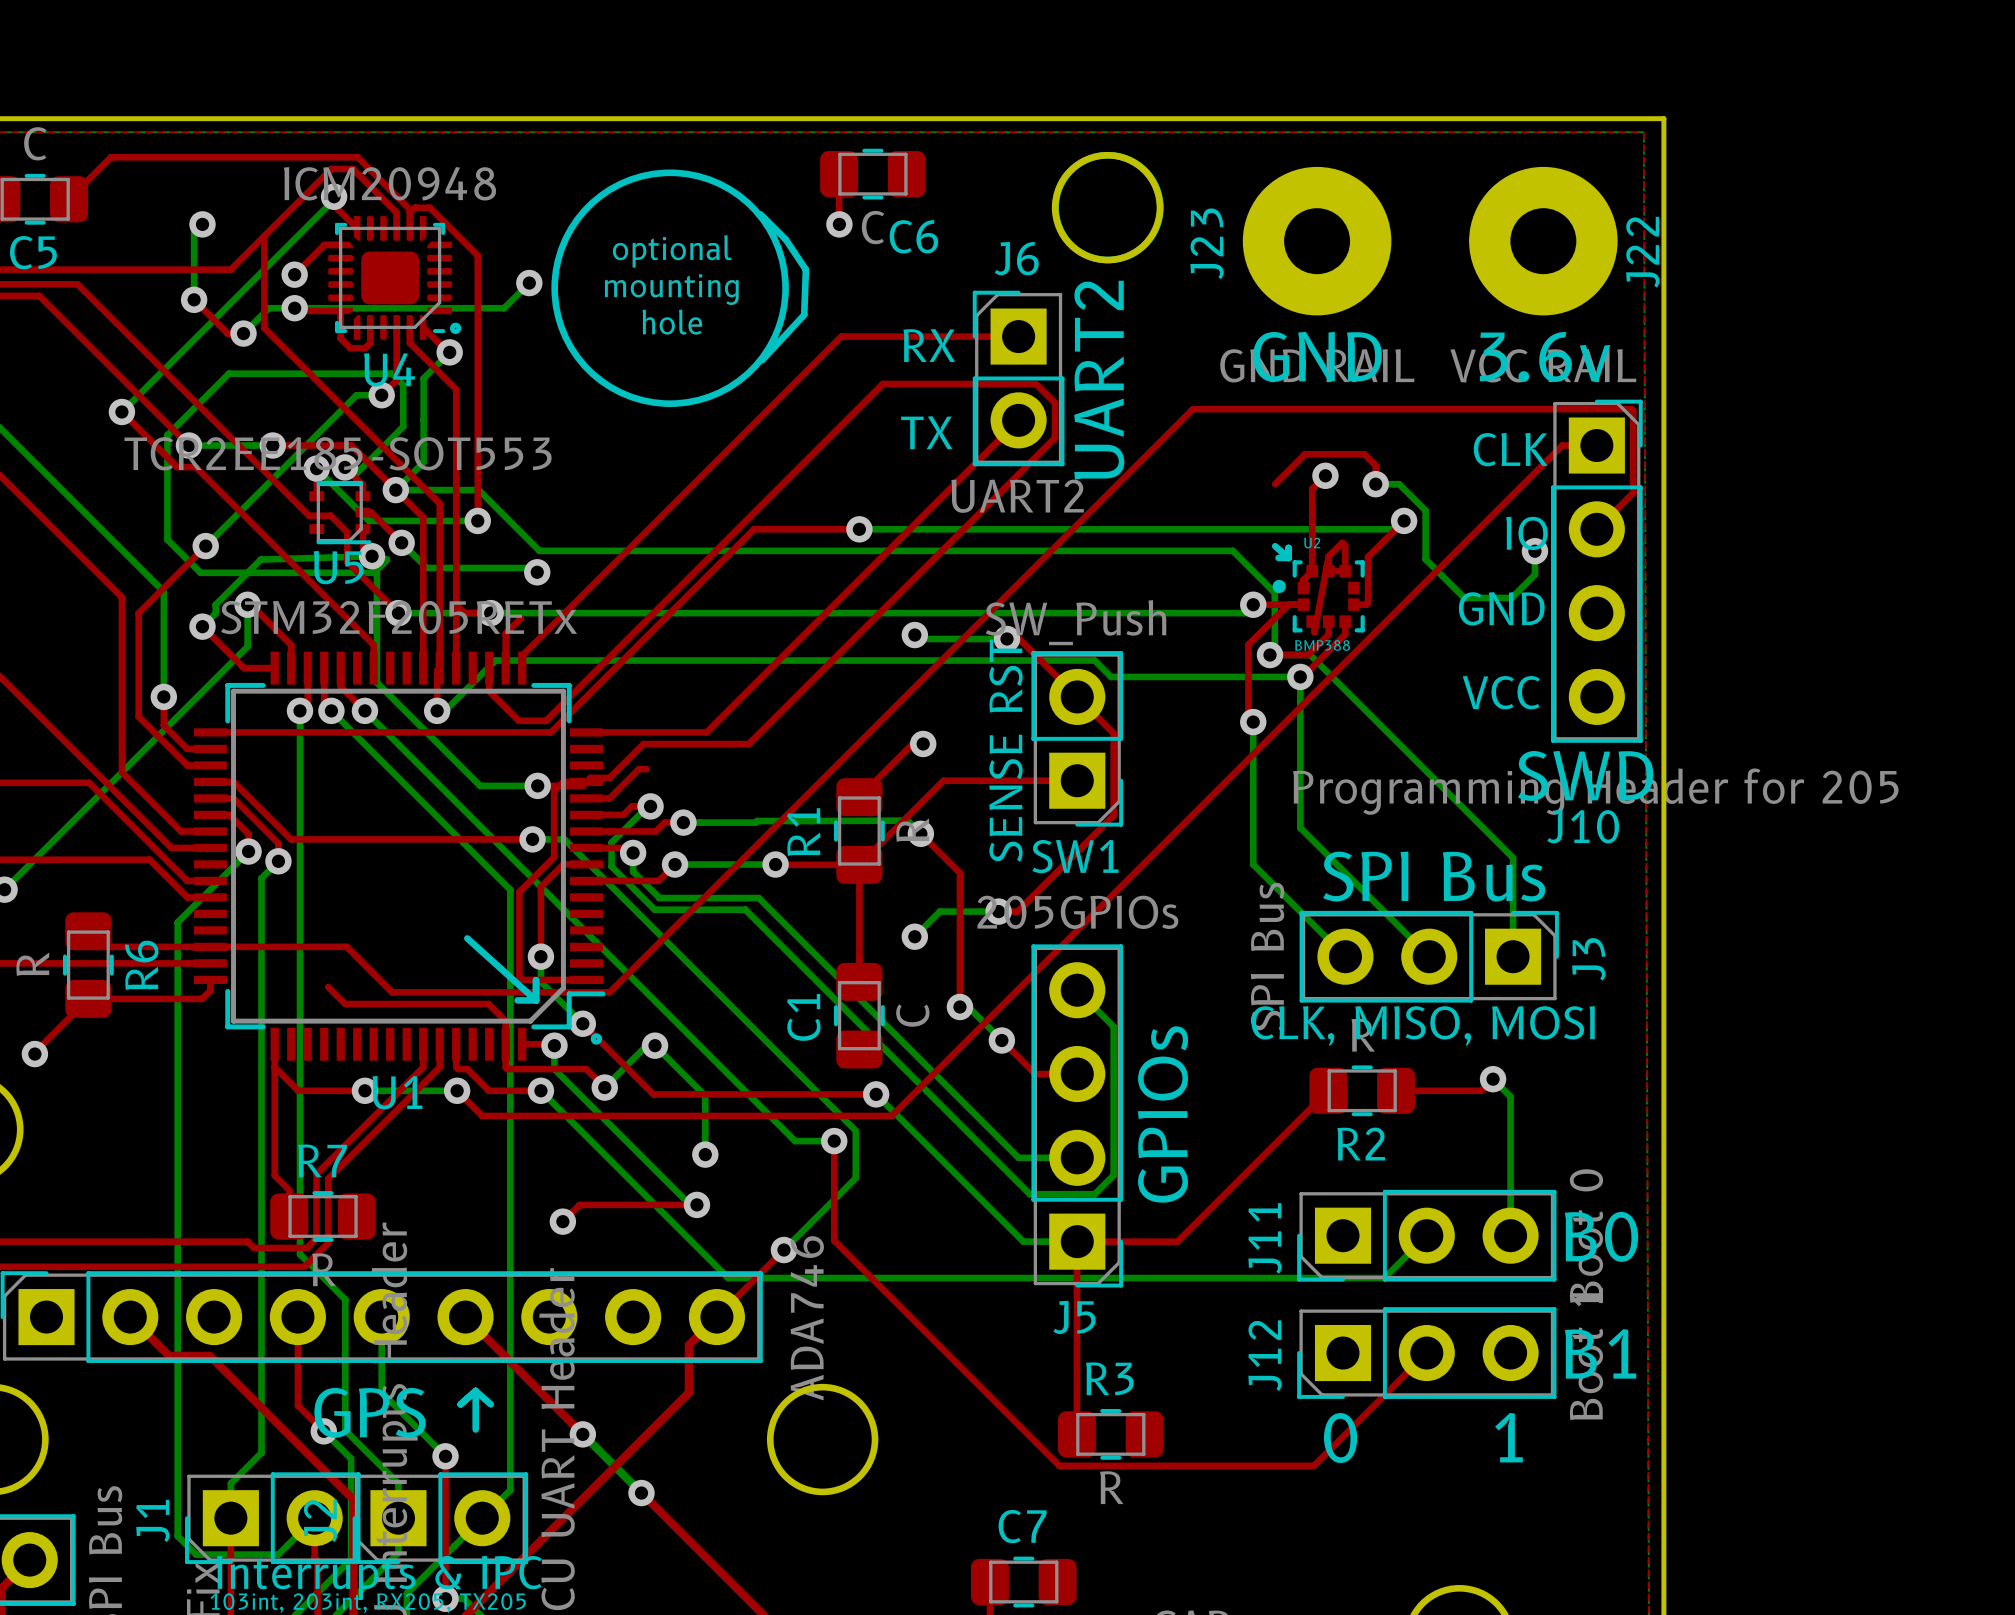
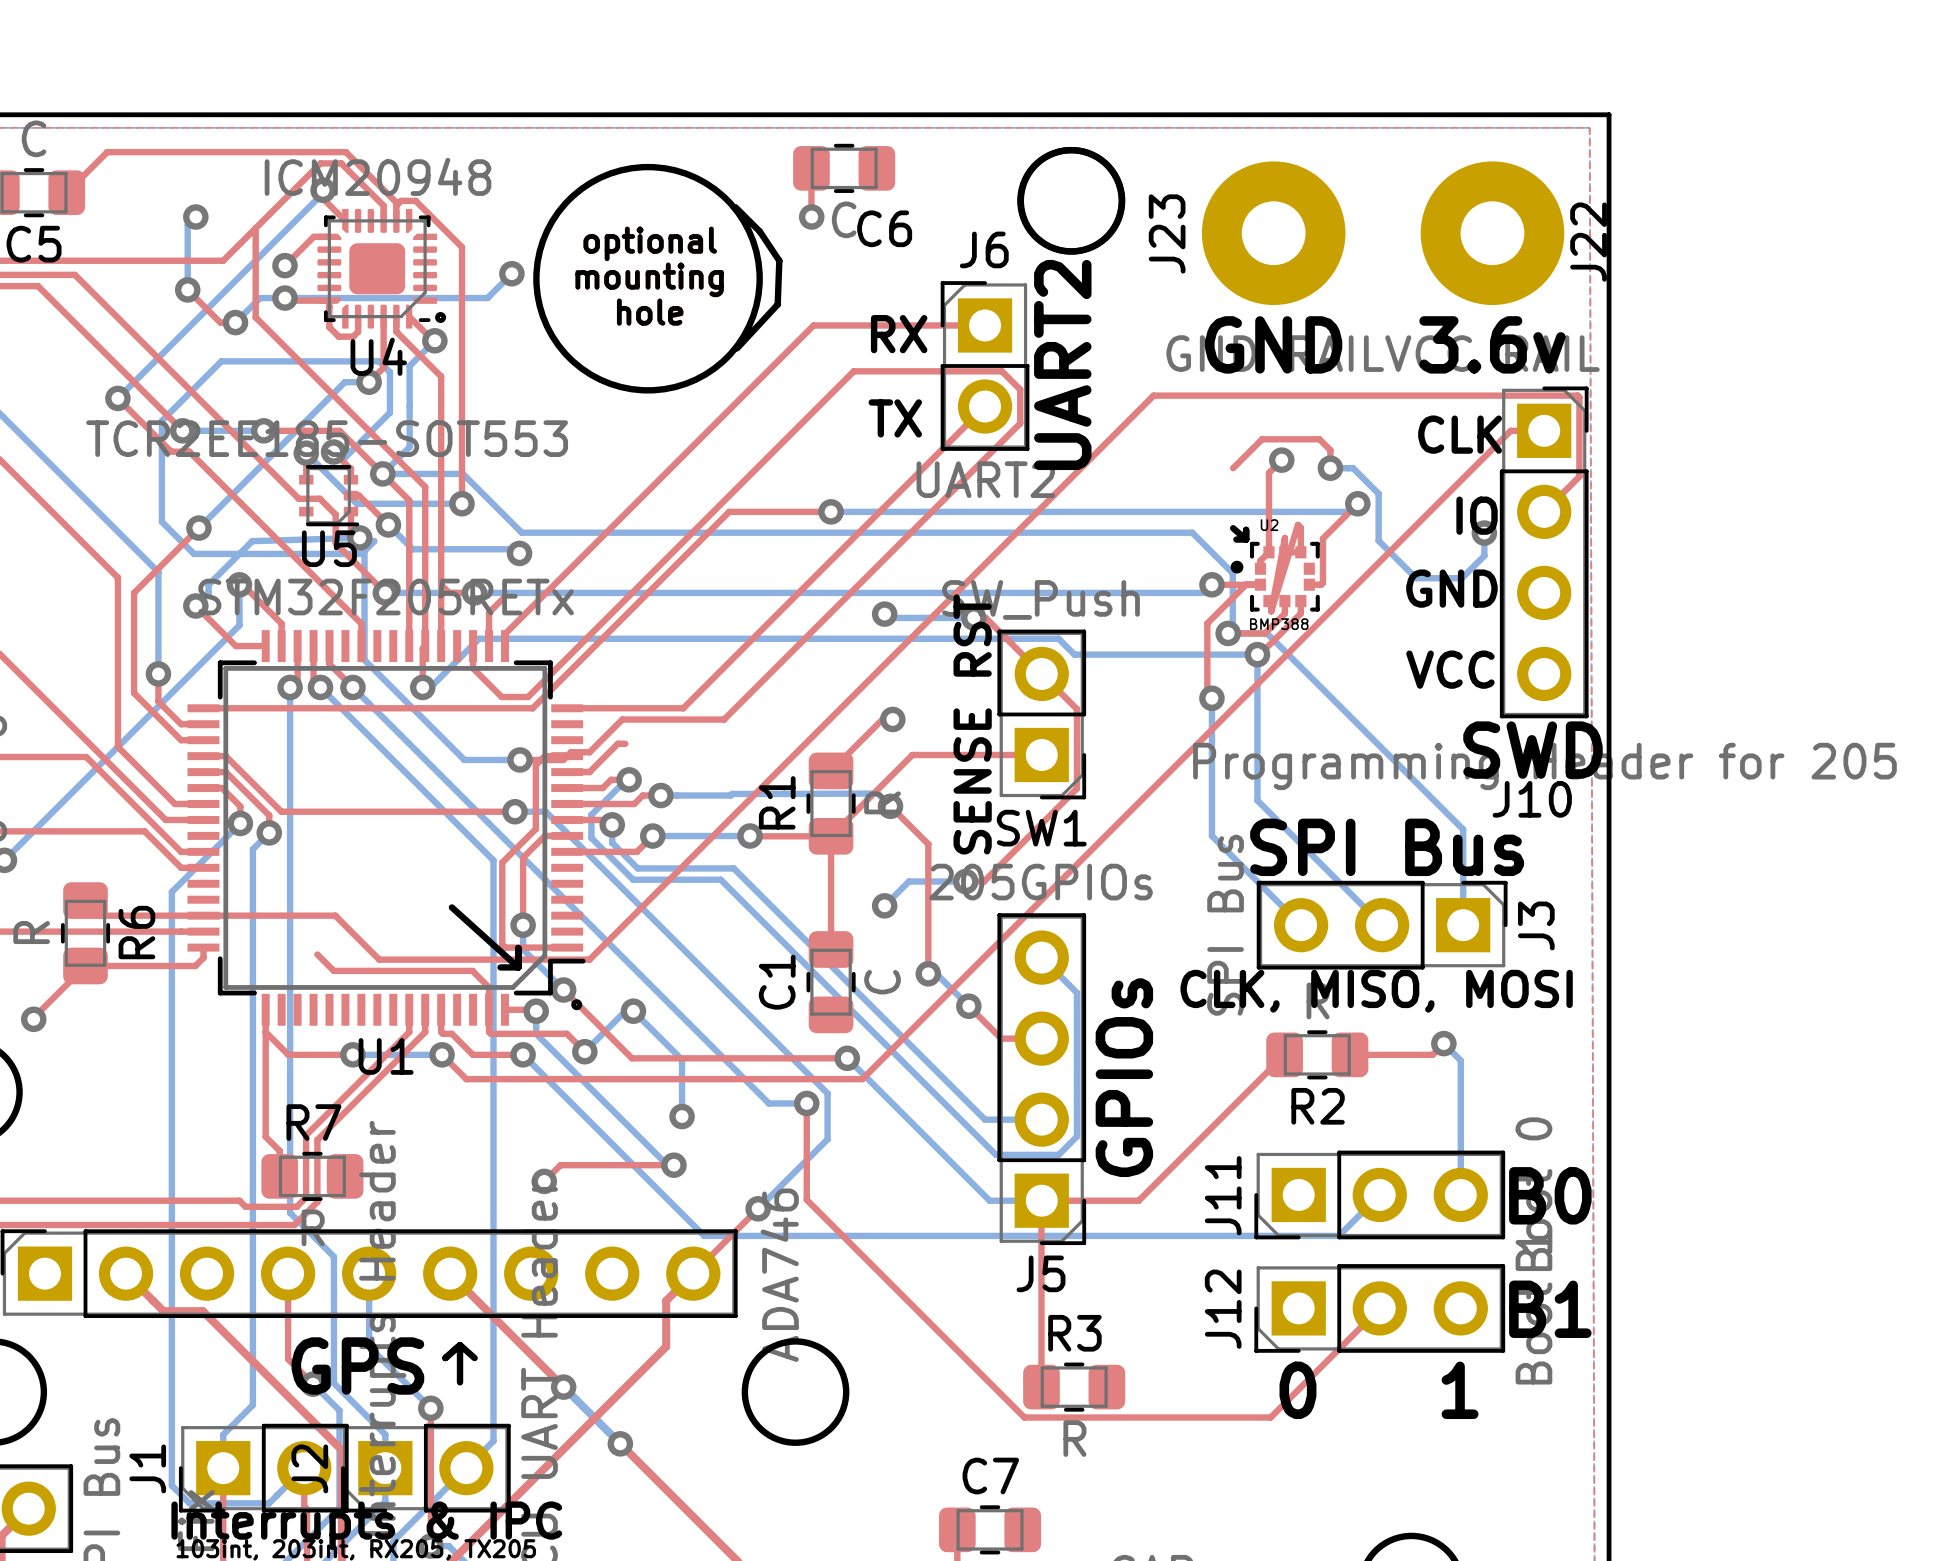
top track: (1342, 542) (1328, 556) -> (1297, 524) (1271, 611)

